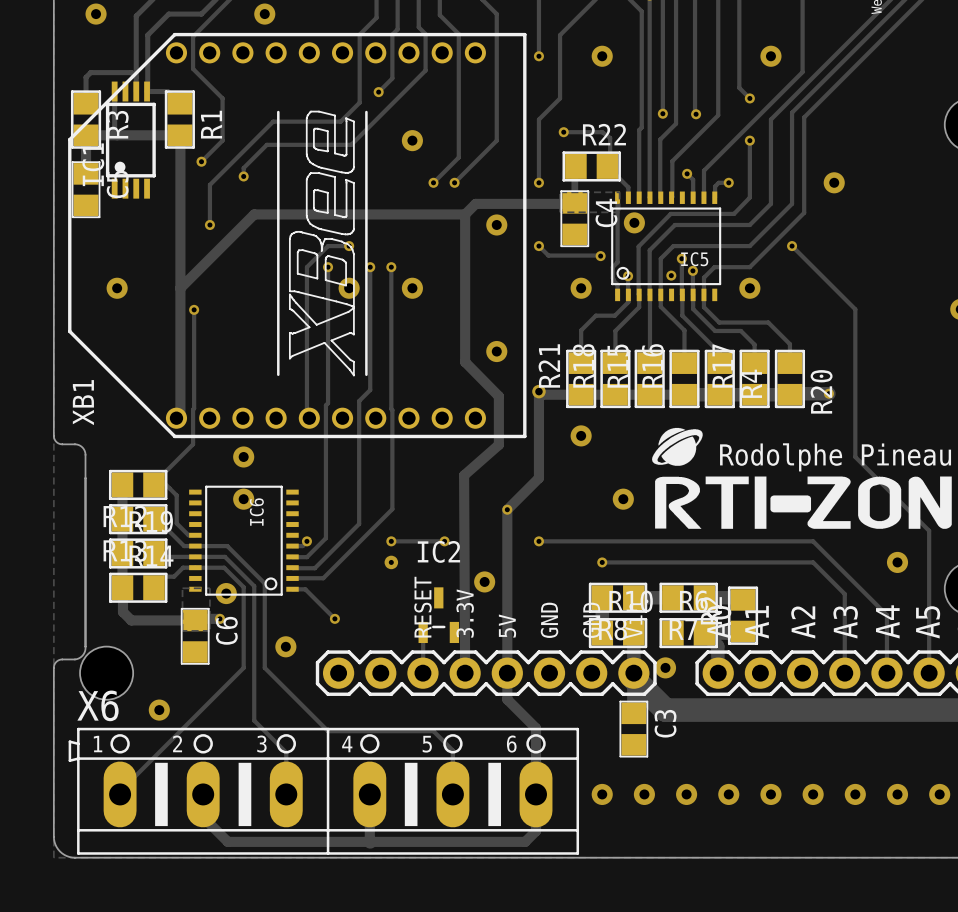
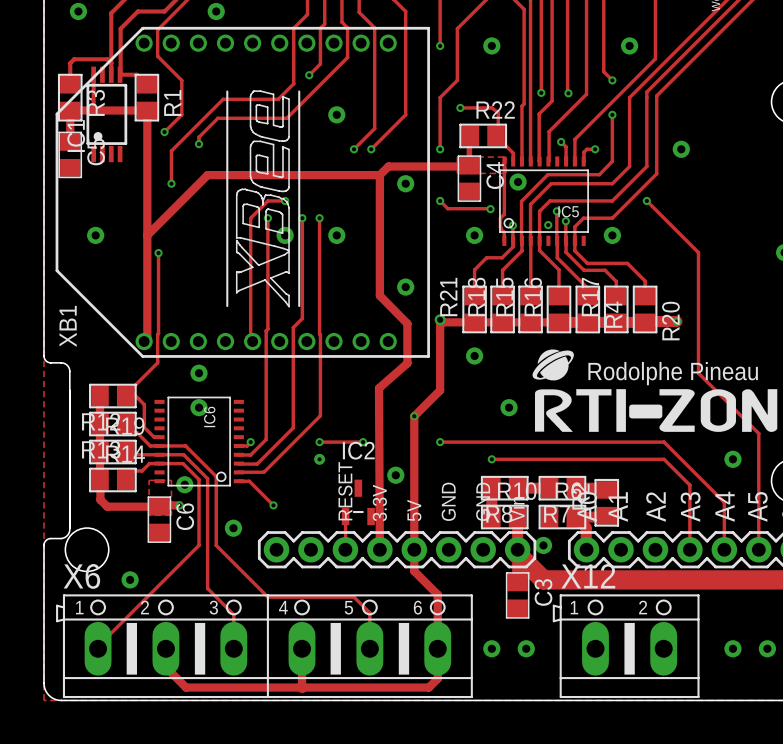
X12: none -> (626, 646)
via: (686, 794) -> none
via: (728, 794) -> none
via: (770, 794) -> none
via: (813, 794) -> none
via: (855, 794) -> none

